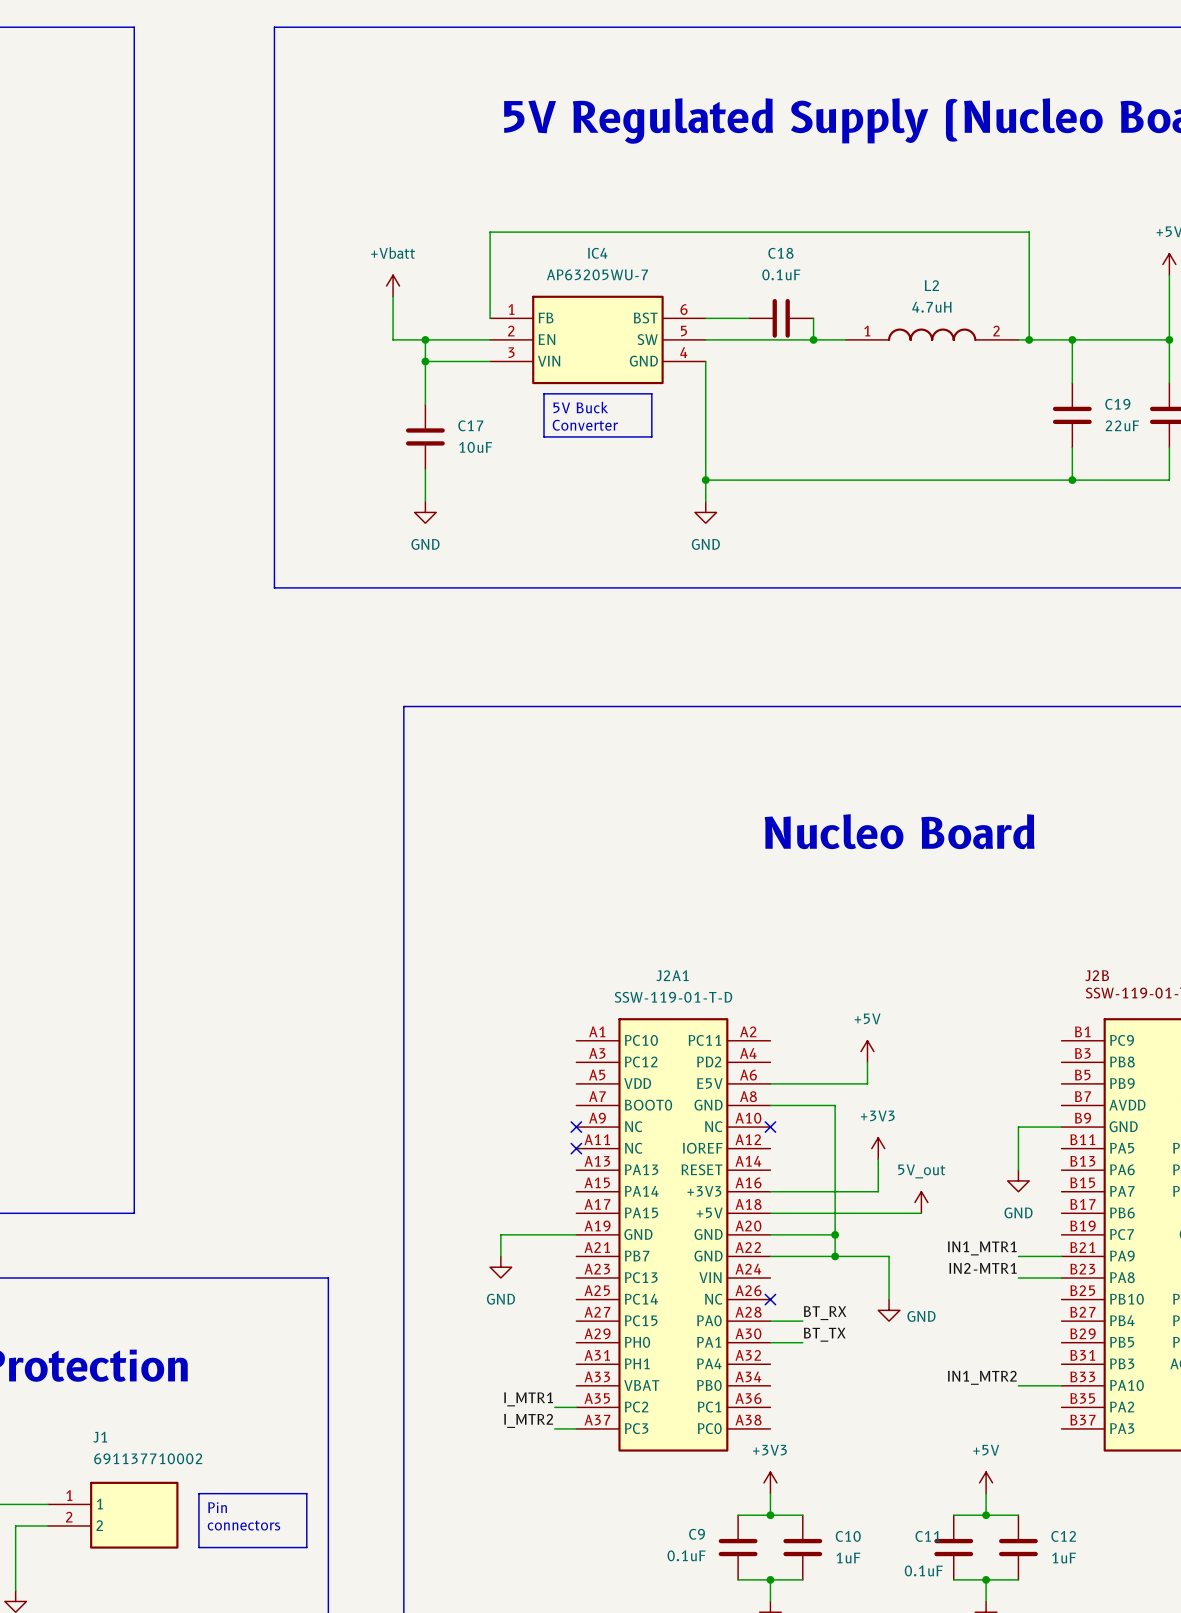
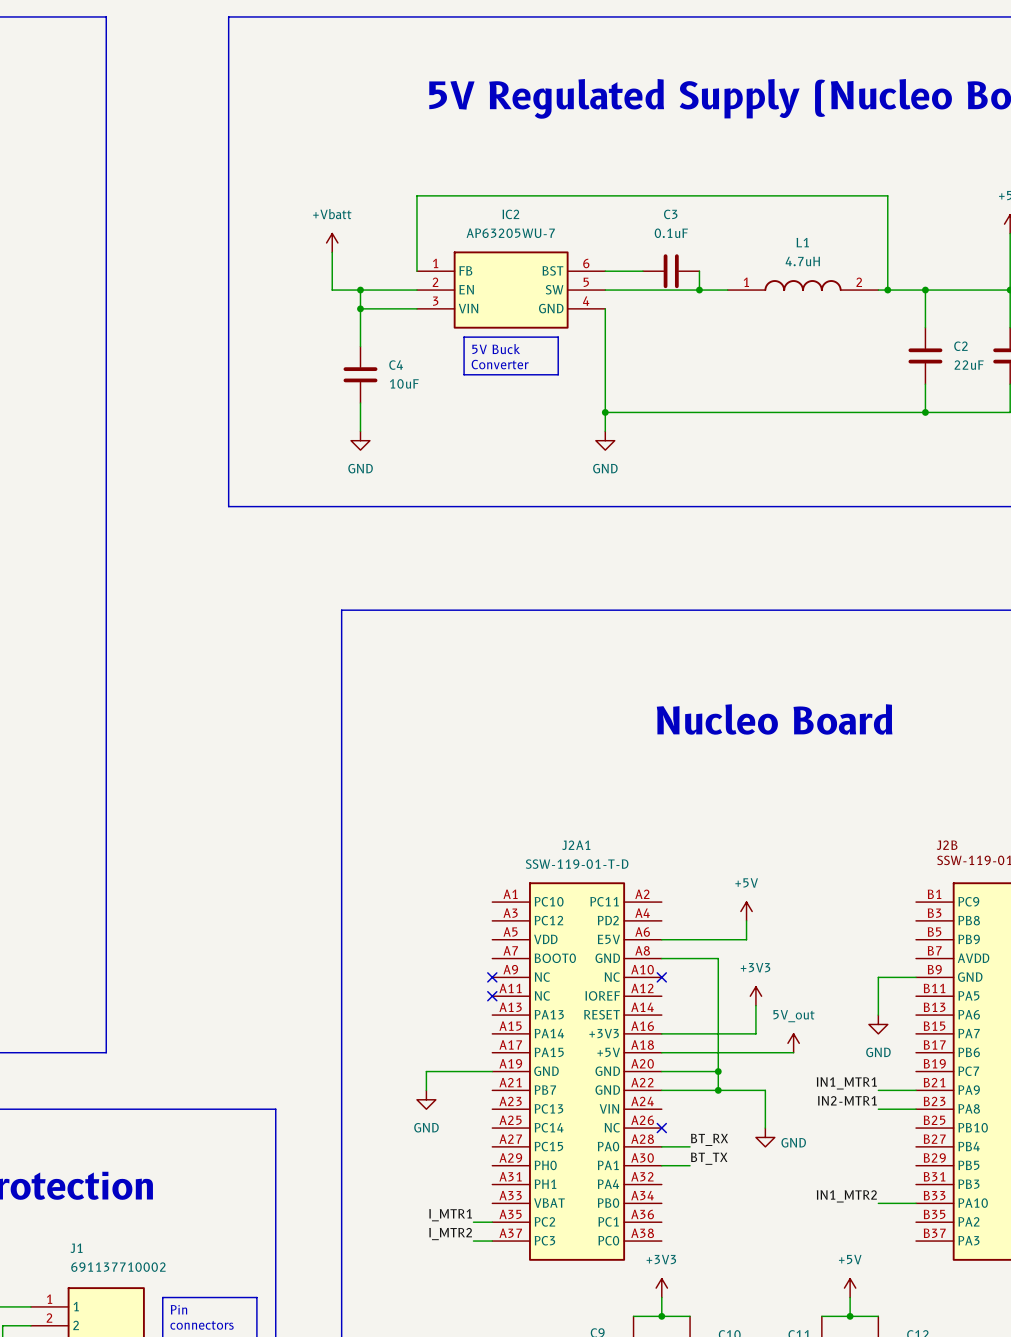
IC4 name: IC4 (597, 253) -> IC2 (510, 214)
C18 name: C18 (780, 253) -> C3 (670, 214)
L2 name: L2 (931, 285) -> L1 (802, 242)
C19 name: C19 (1117, 404) -> C2 (960, 346)
C17 name: C17 (470, 425) -> C4 (396, 365)

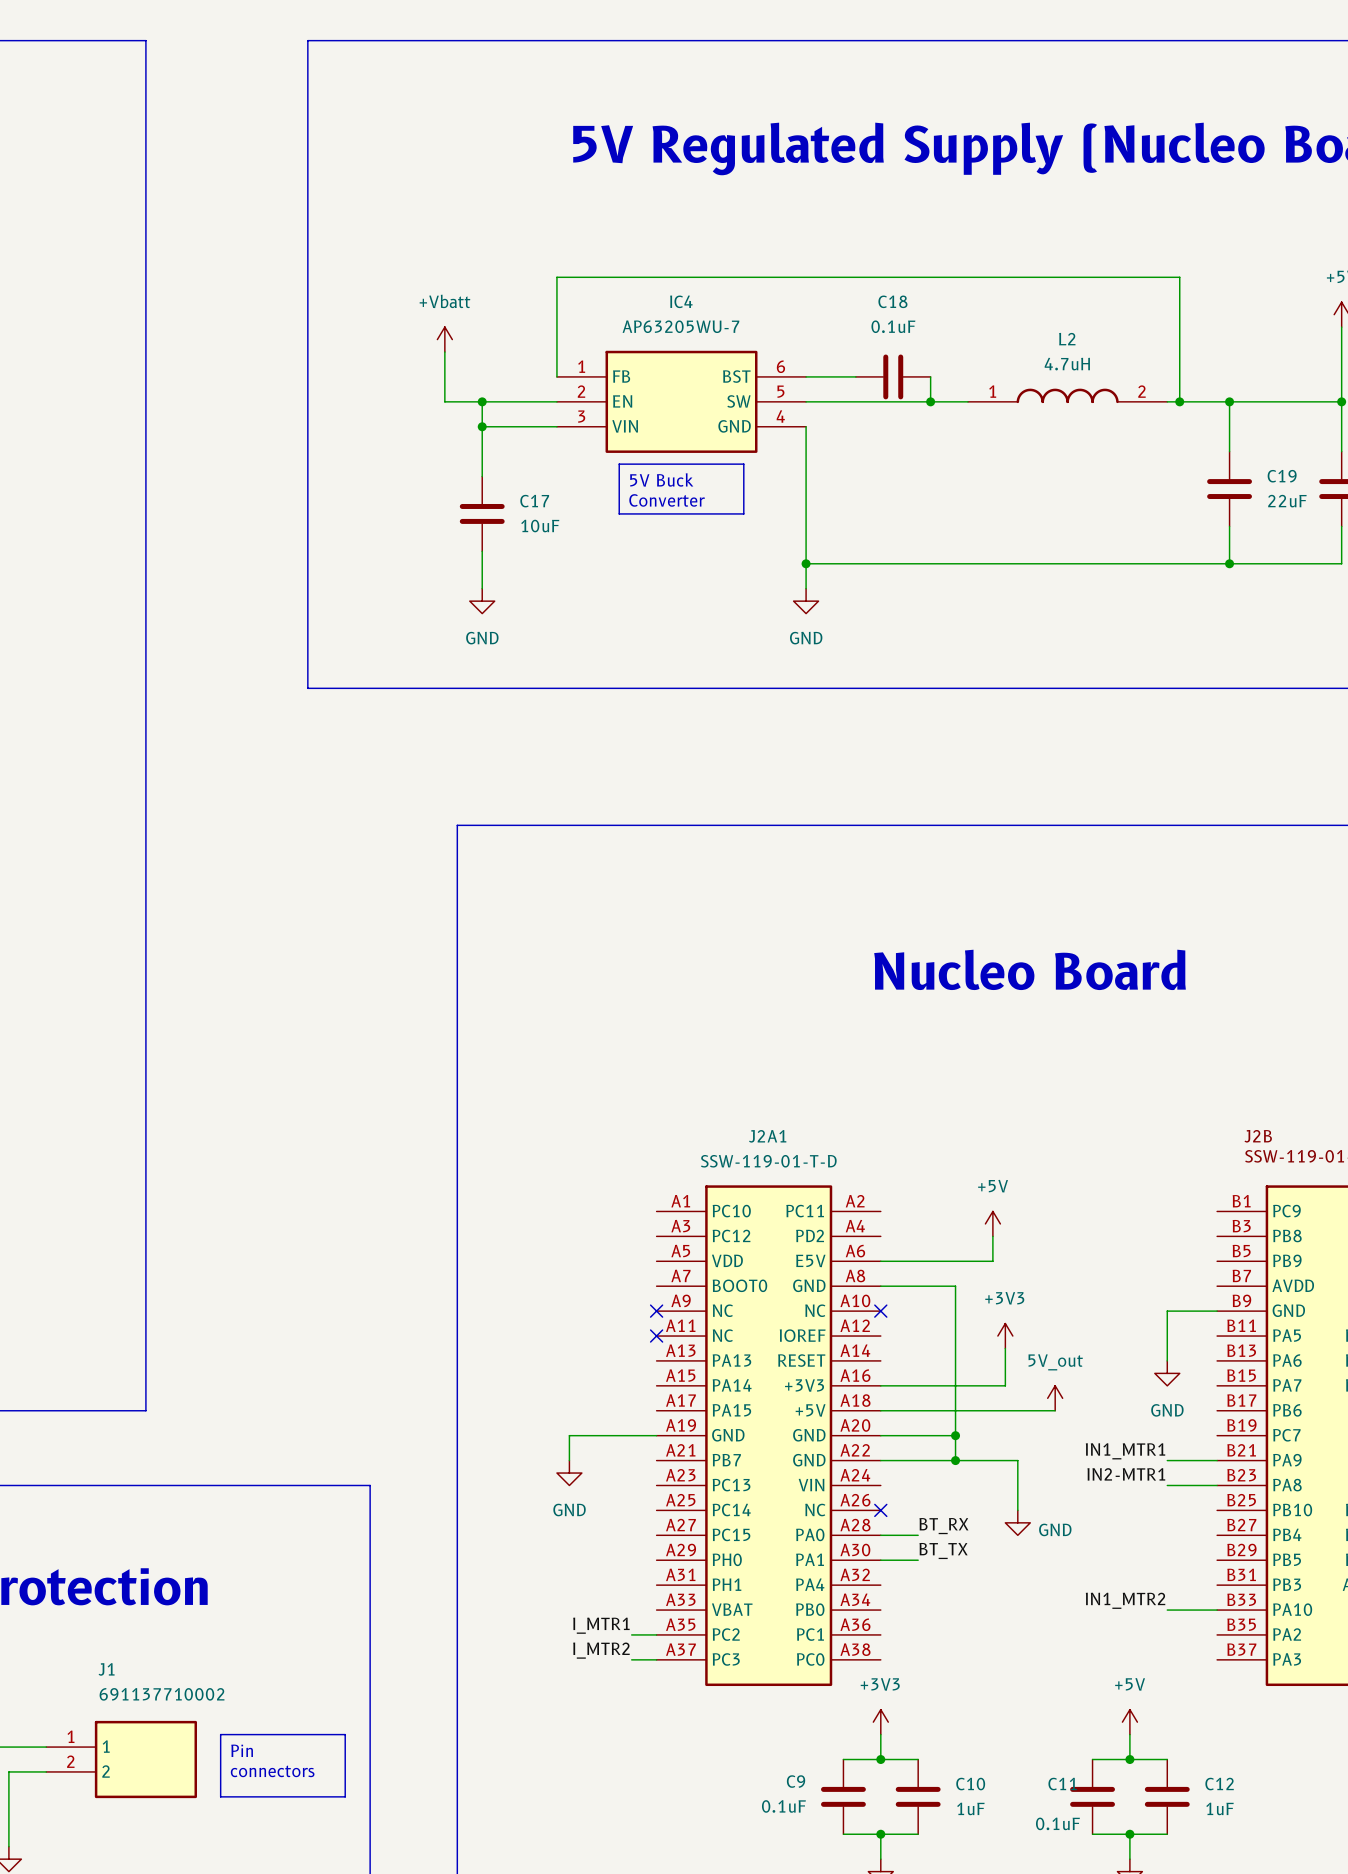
IC2 name: IC2 (510, 214) -> IC4 (681, 301)
C3 name: C3 (670, 214) -> C18 (892, 301)
L1 name: L1 (802, 242) -> L2 (1067, 339)
C2 name: C2 (960, 346) -> C19 (1282, 476)
C4 name: C4 (396, 365) -> C17 (534, 501)

